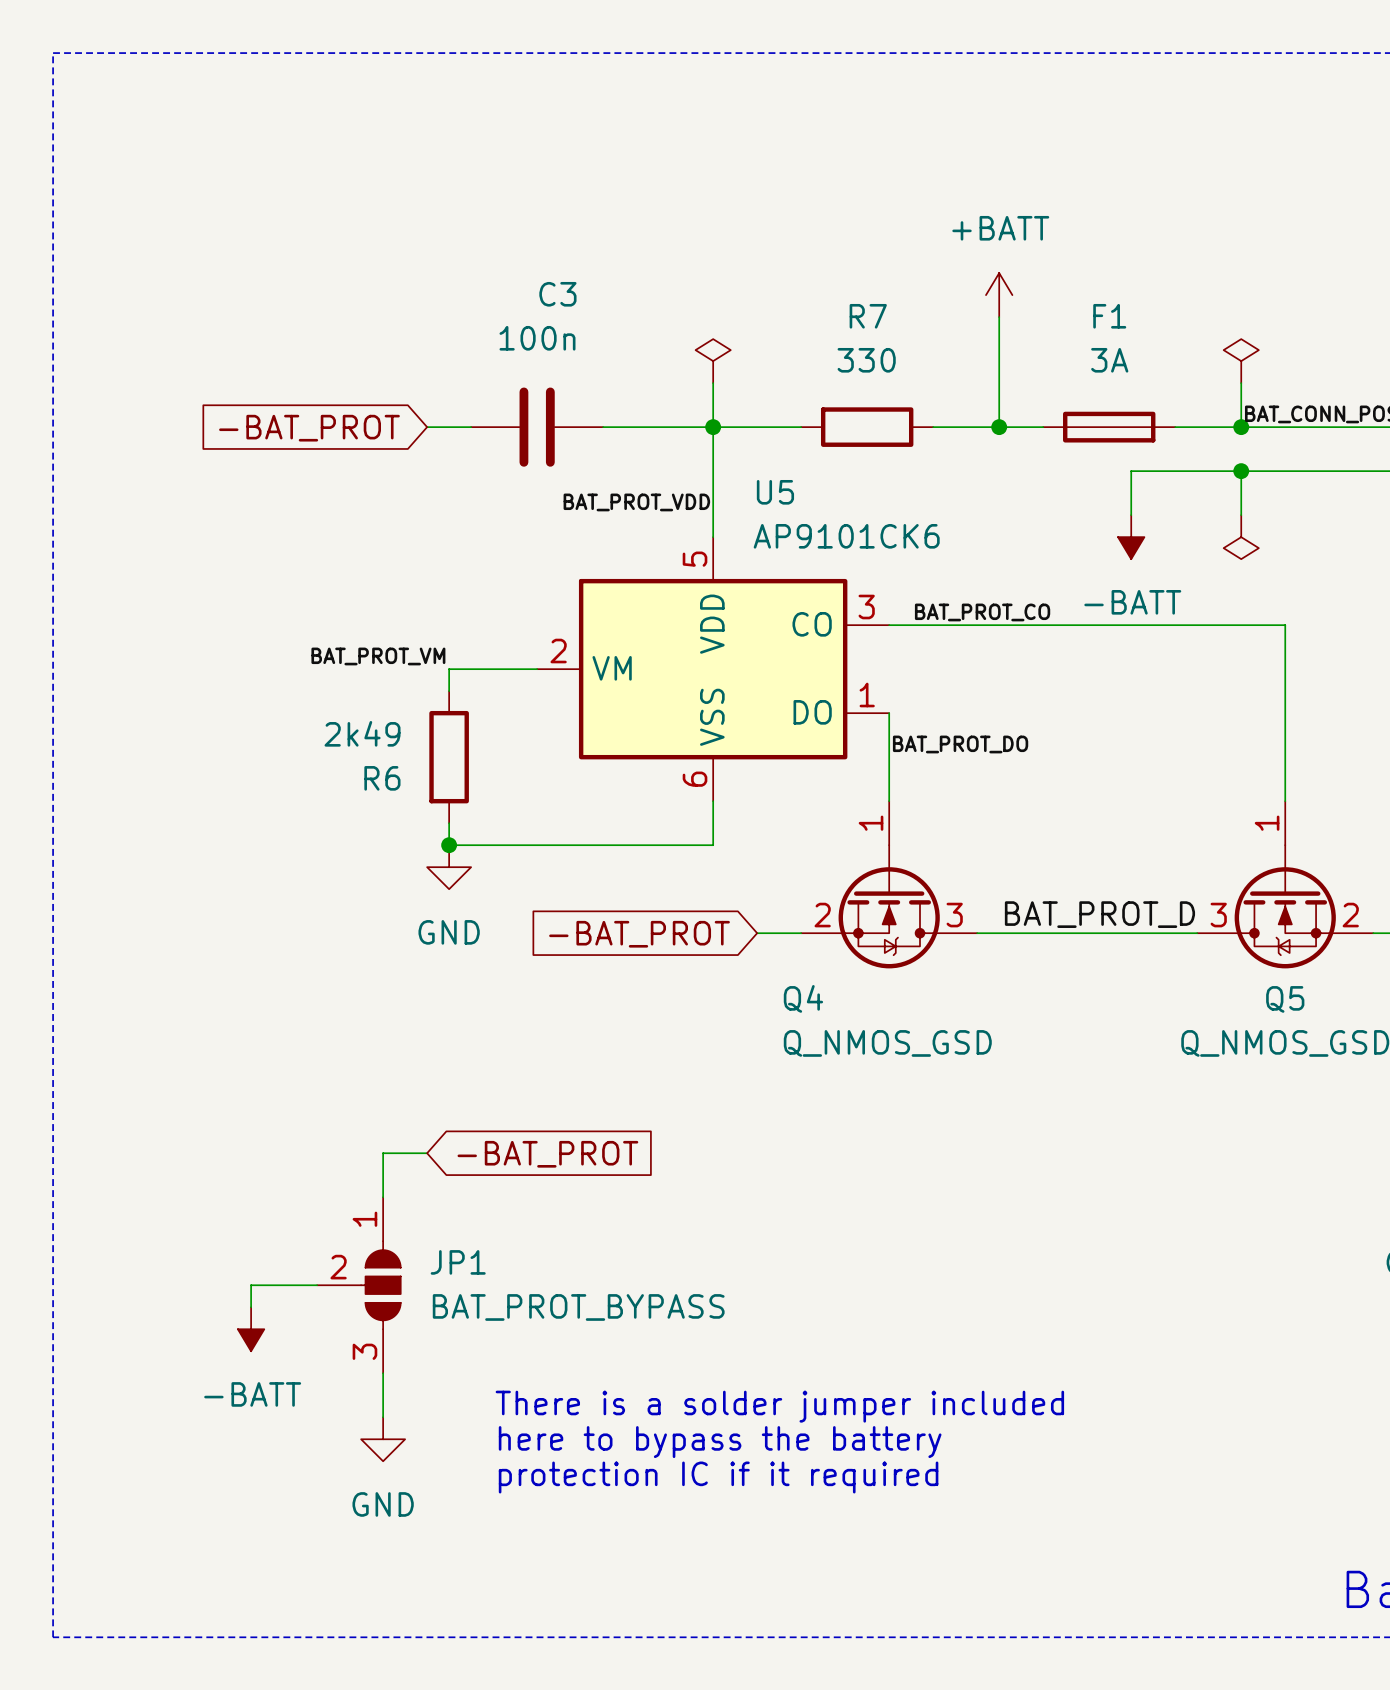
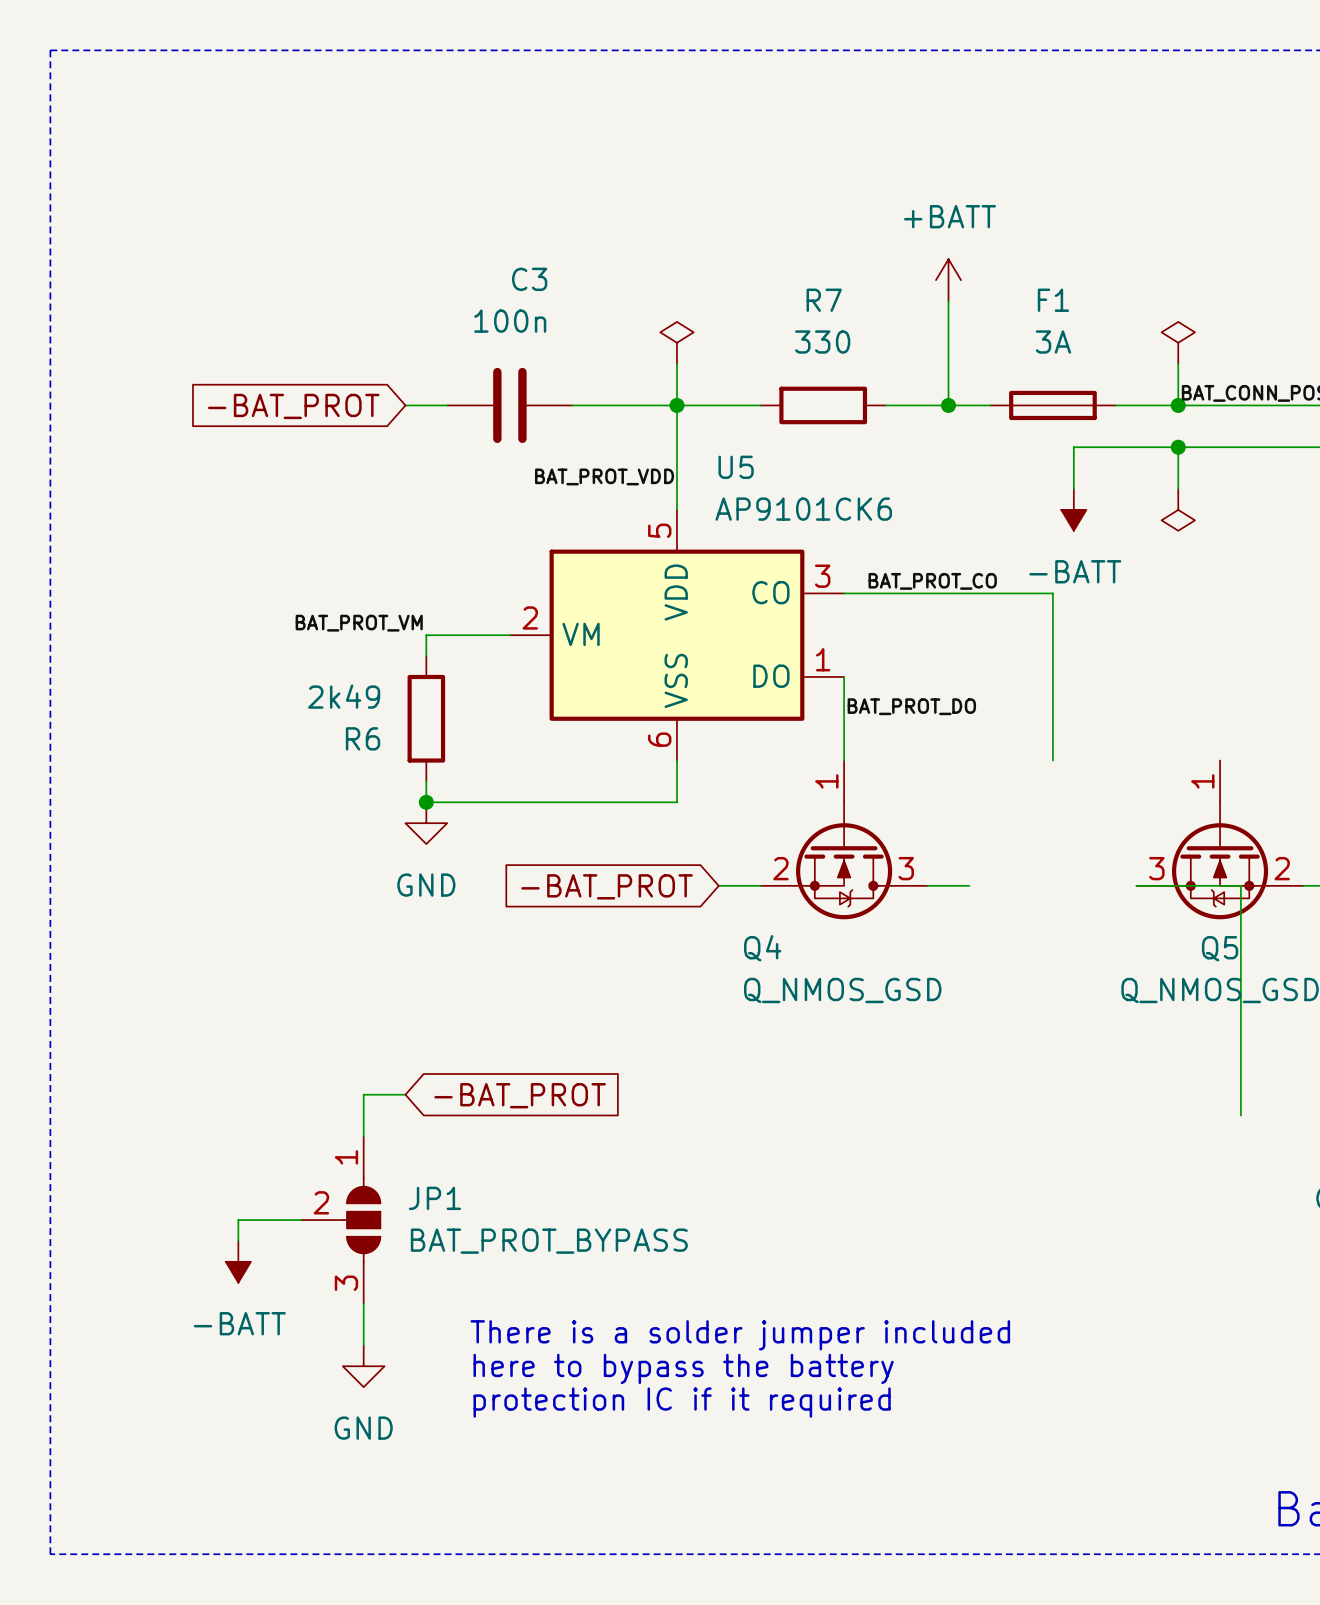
wire: (1109, 625) (1285, 625) (1285, 801) -> (1052, 593) (1052, 760)
label: BAT_PROT_D (1099, 914) -> none
wire: (1021, 933) (1197, 933) -> (1240, 1115) (1240, 885) (1136, 885)

